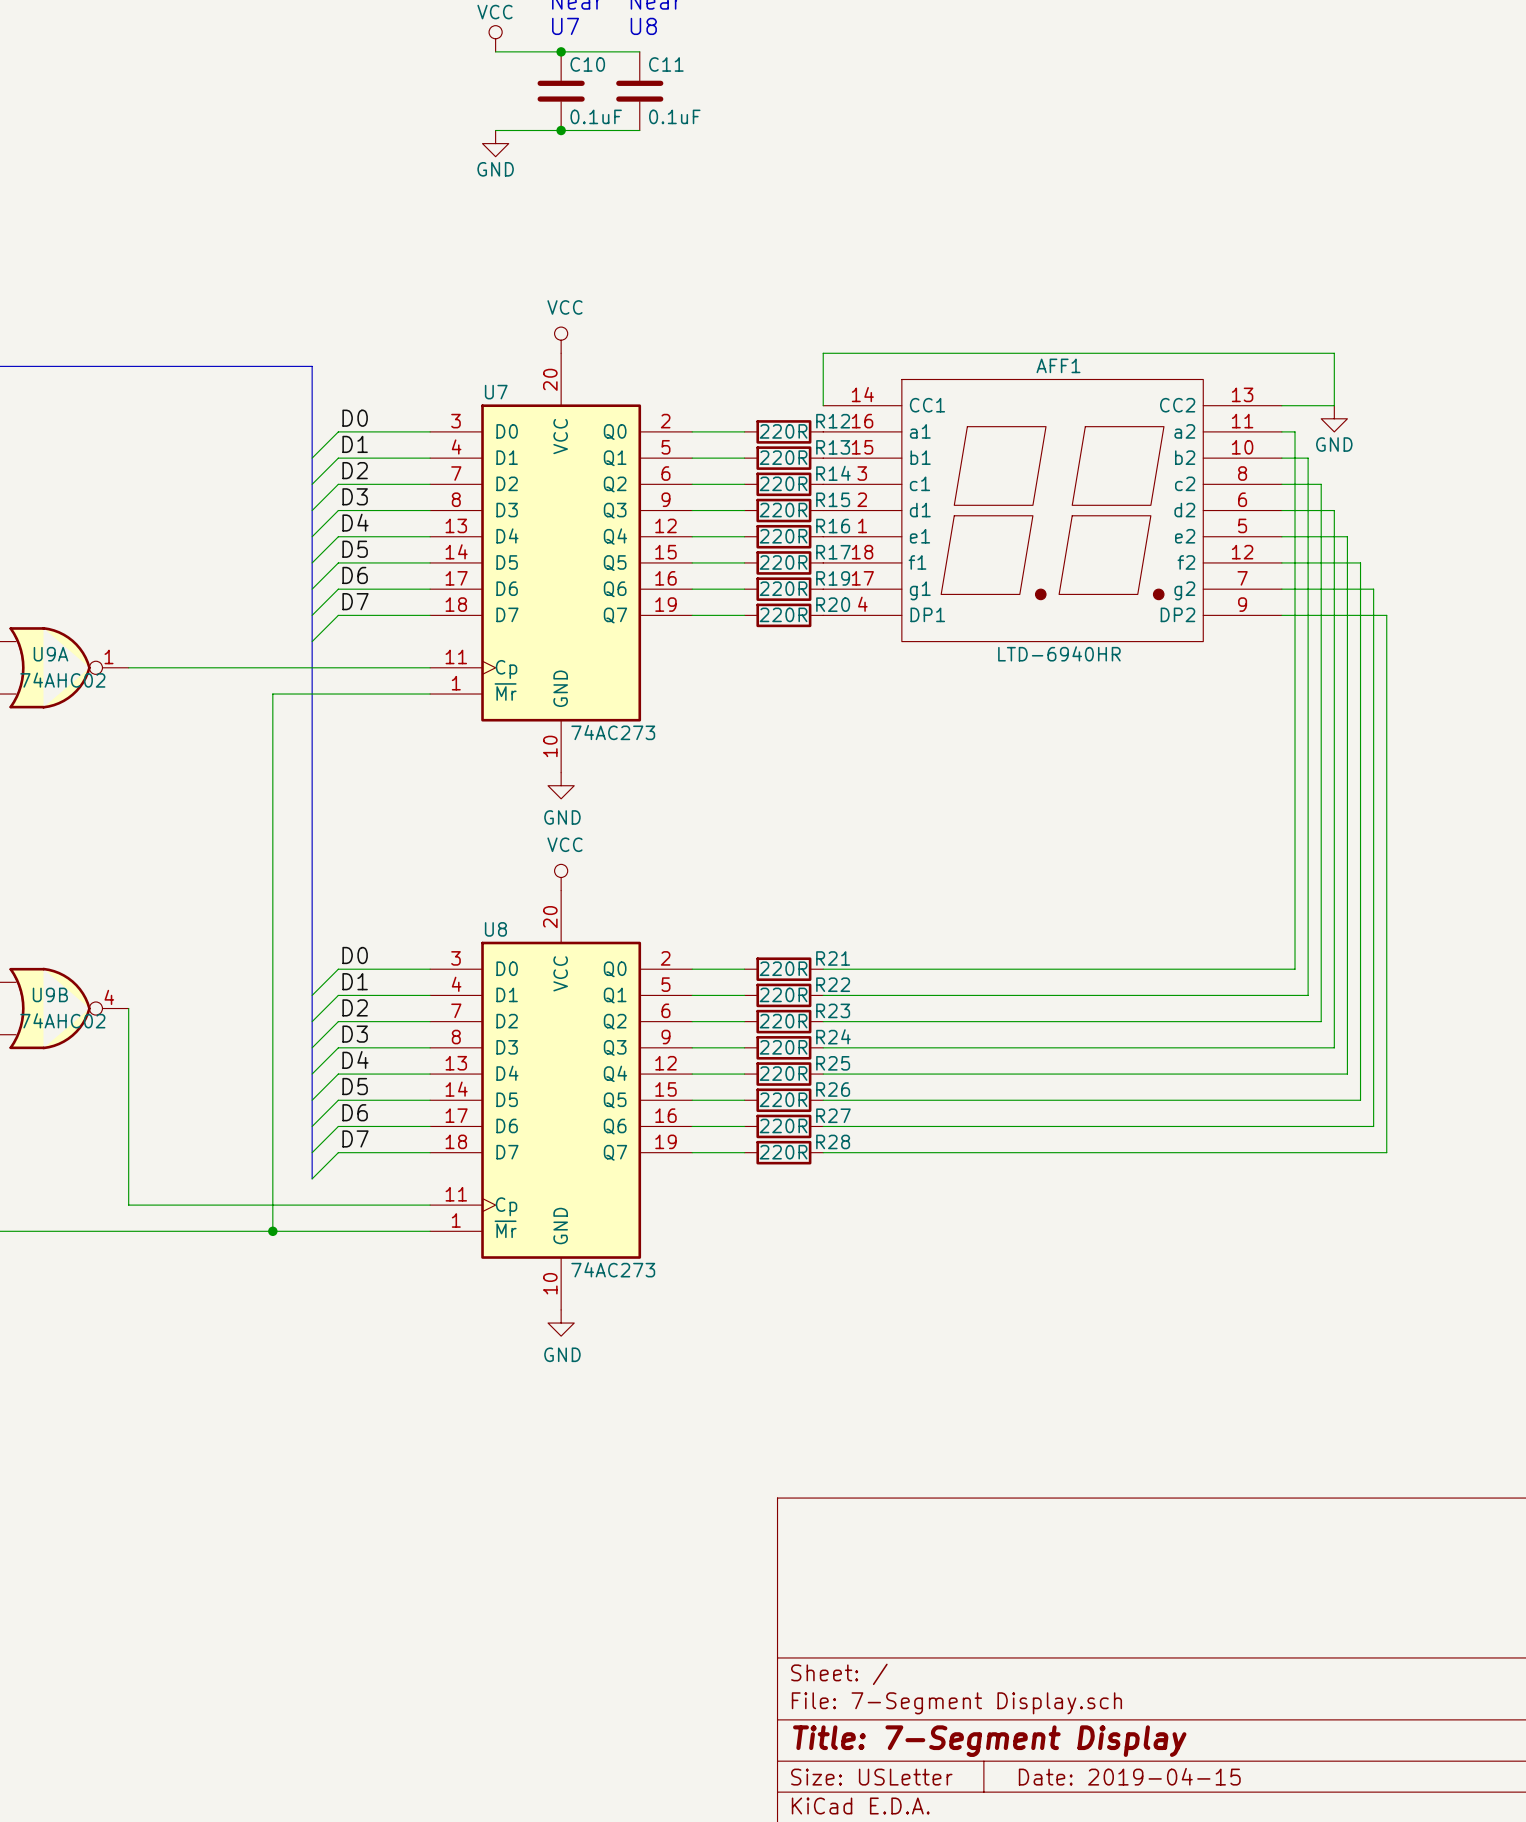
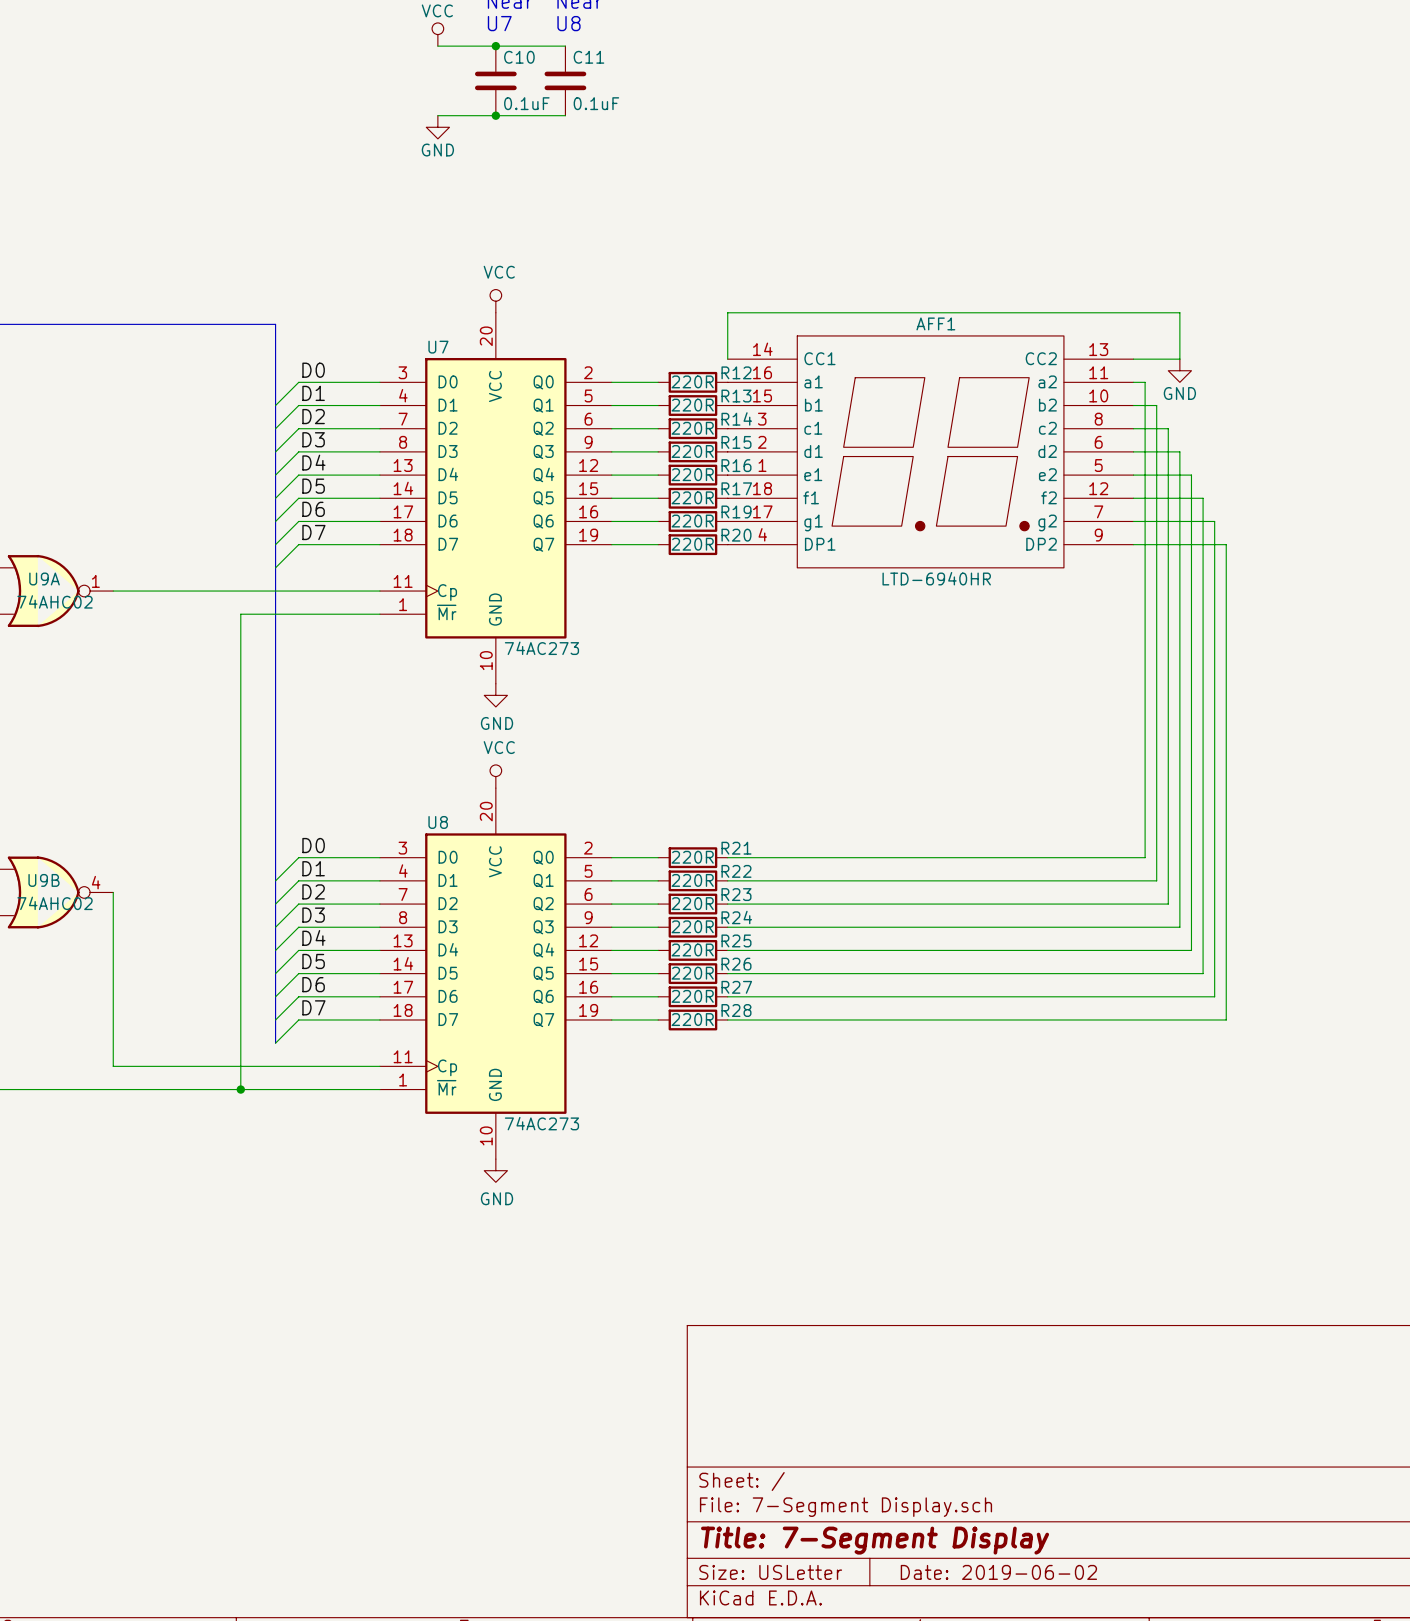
title block: Date: 2019-04-15 (1129, 1776) -> Date: 2019-06-02 (998, 1572)

